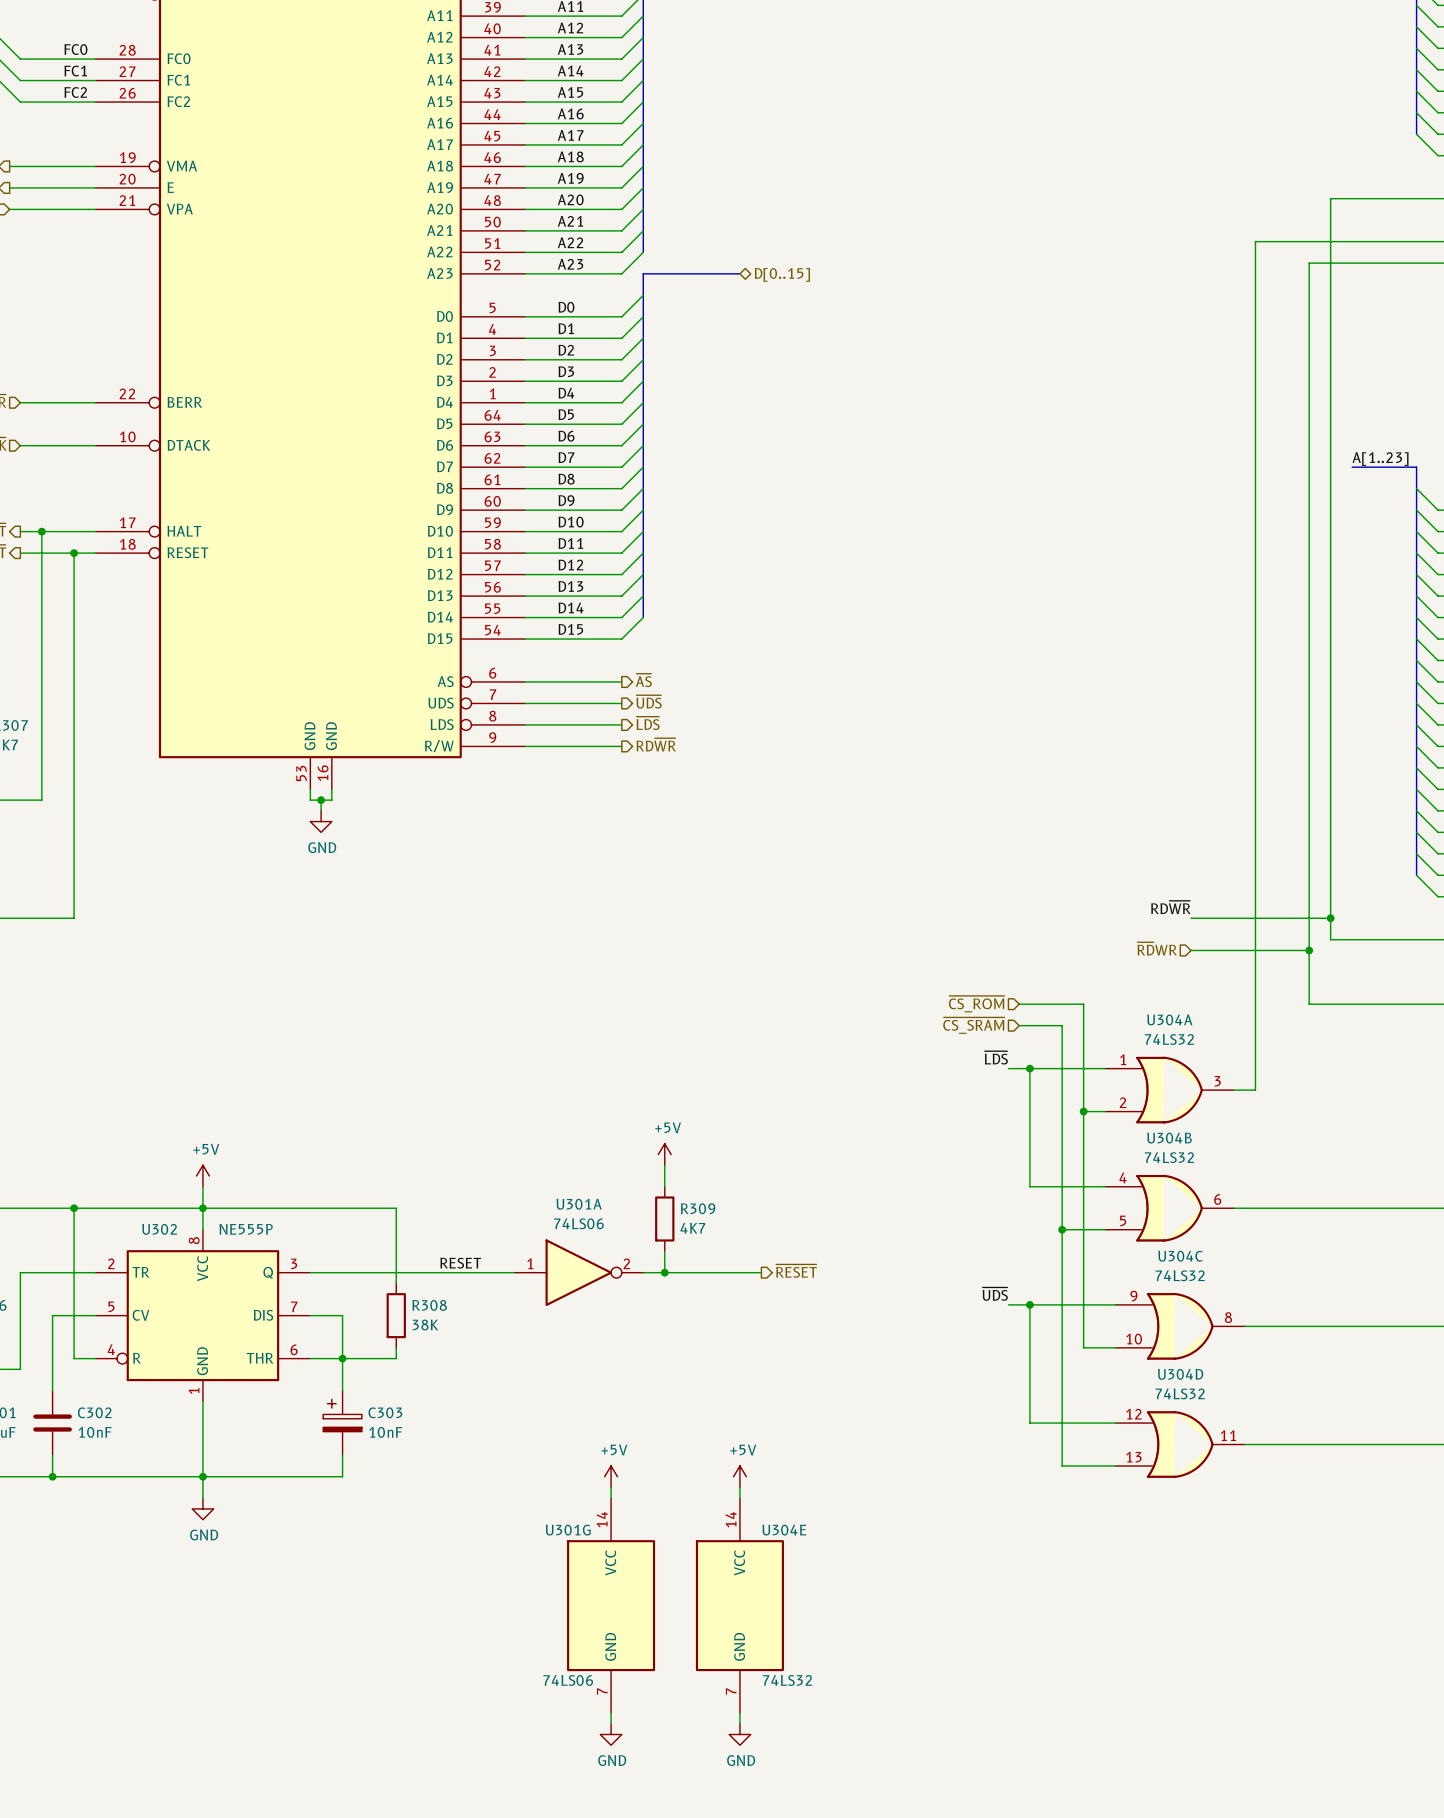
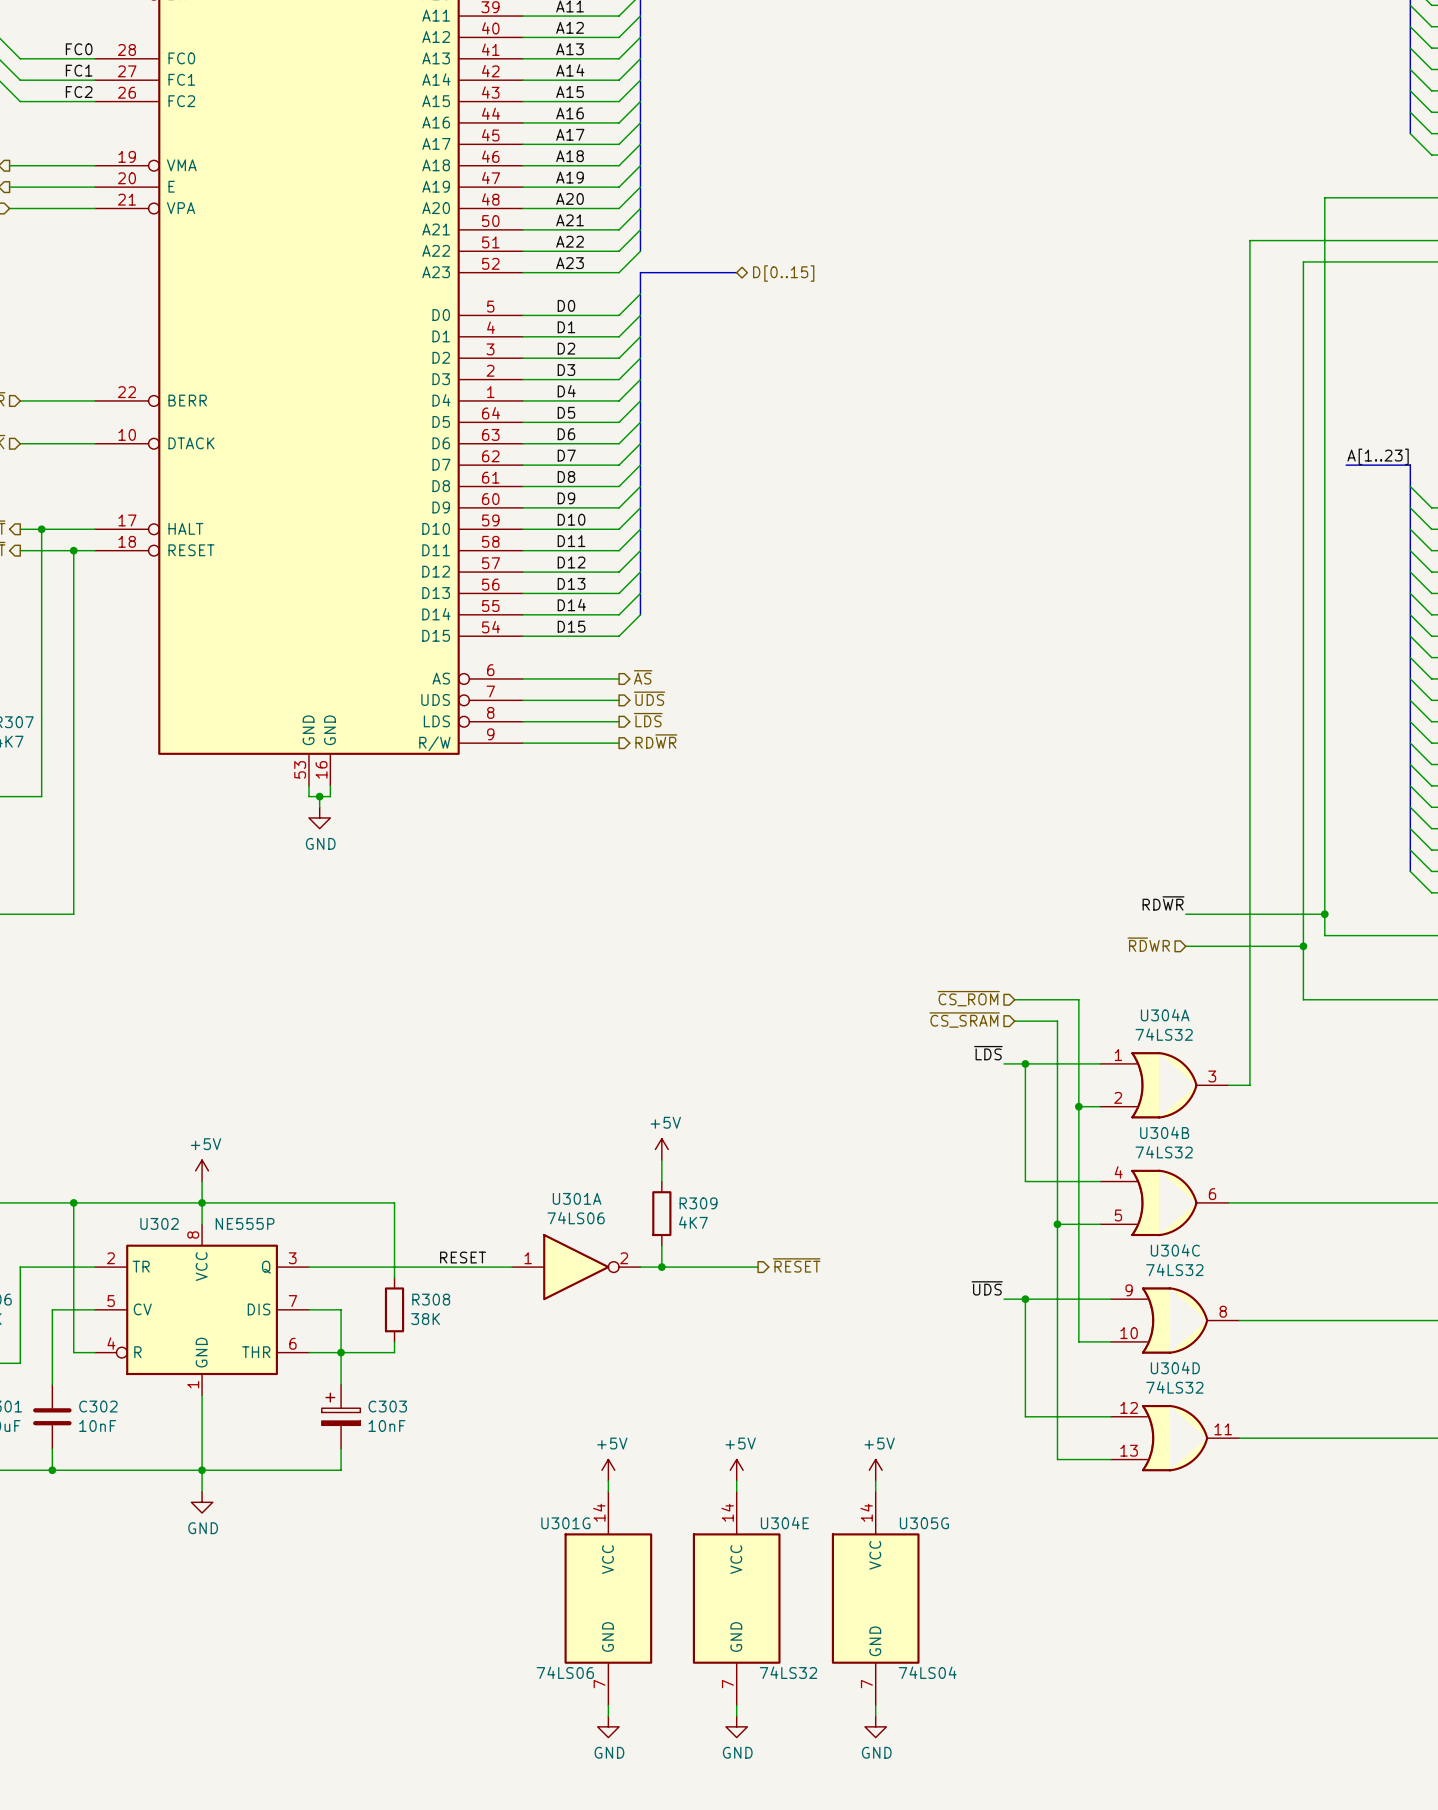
power symbol: none -> +5V (875, 1470)
wire: none -> (875, 1480) (875, 1491)
U305G: none -> 74LS04 (875, 1598)
wire: none -> (875, 1705) (875, 1716)
power symbol: none -> GND (875, 1726)

